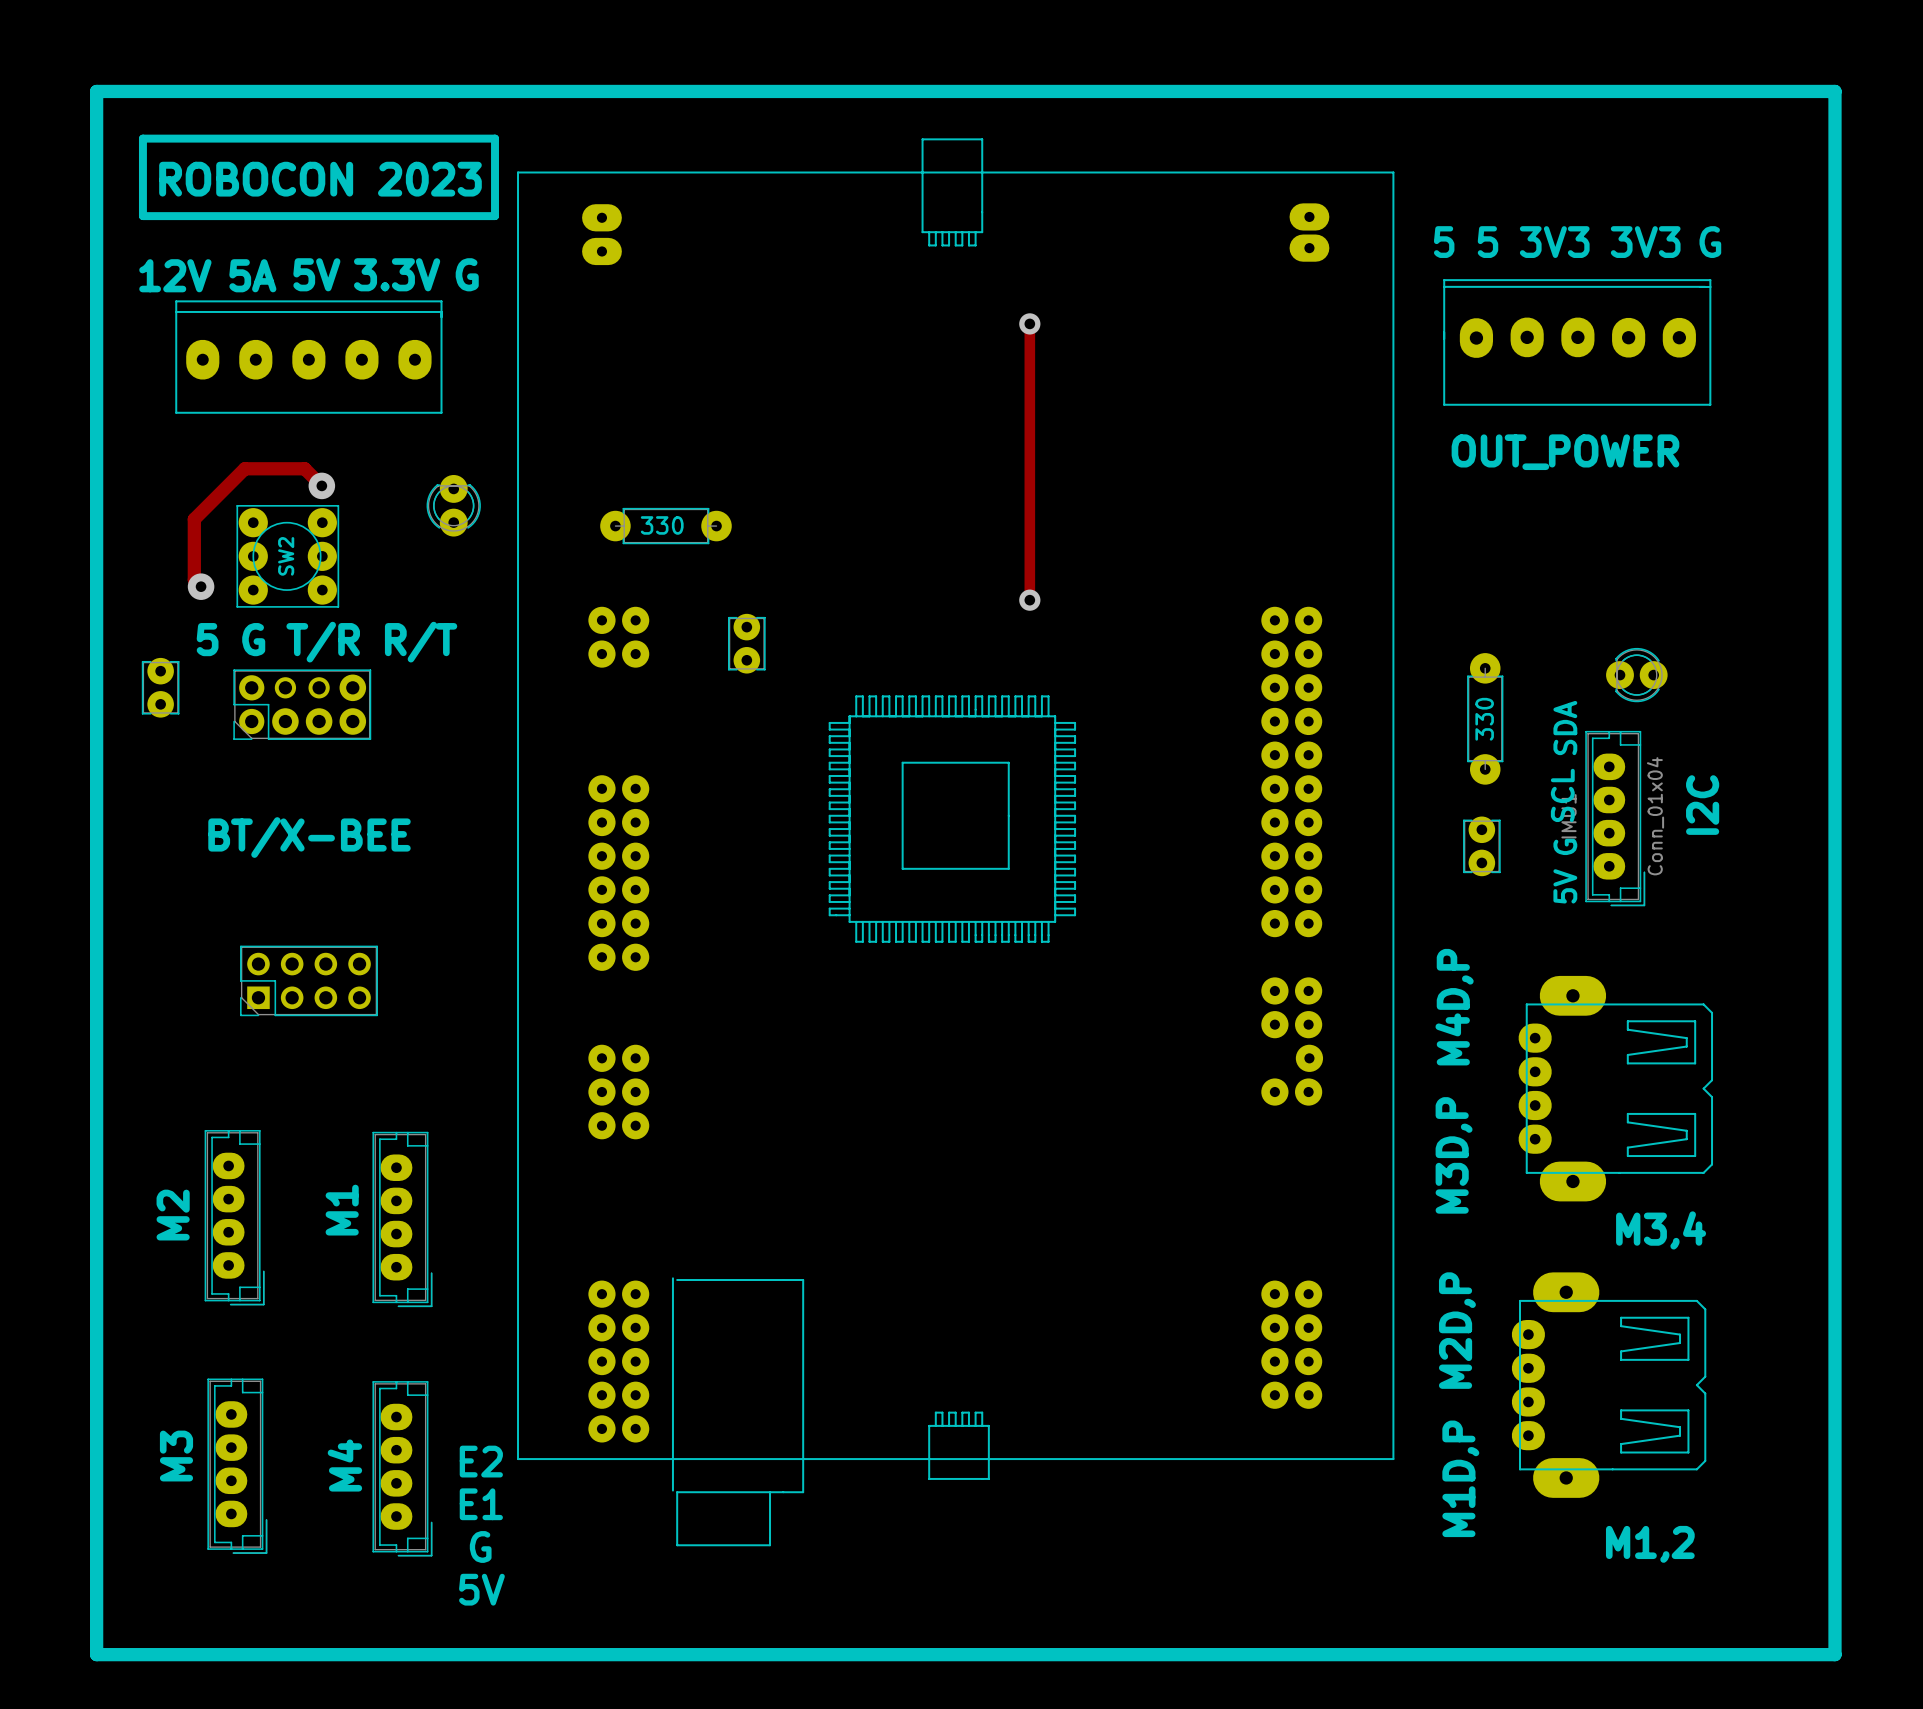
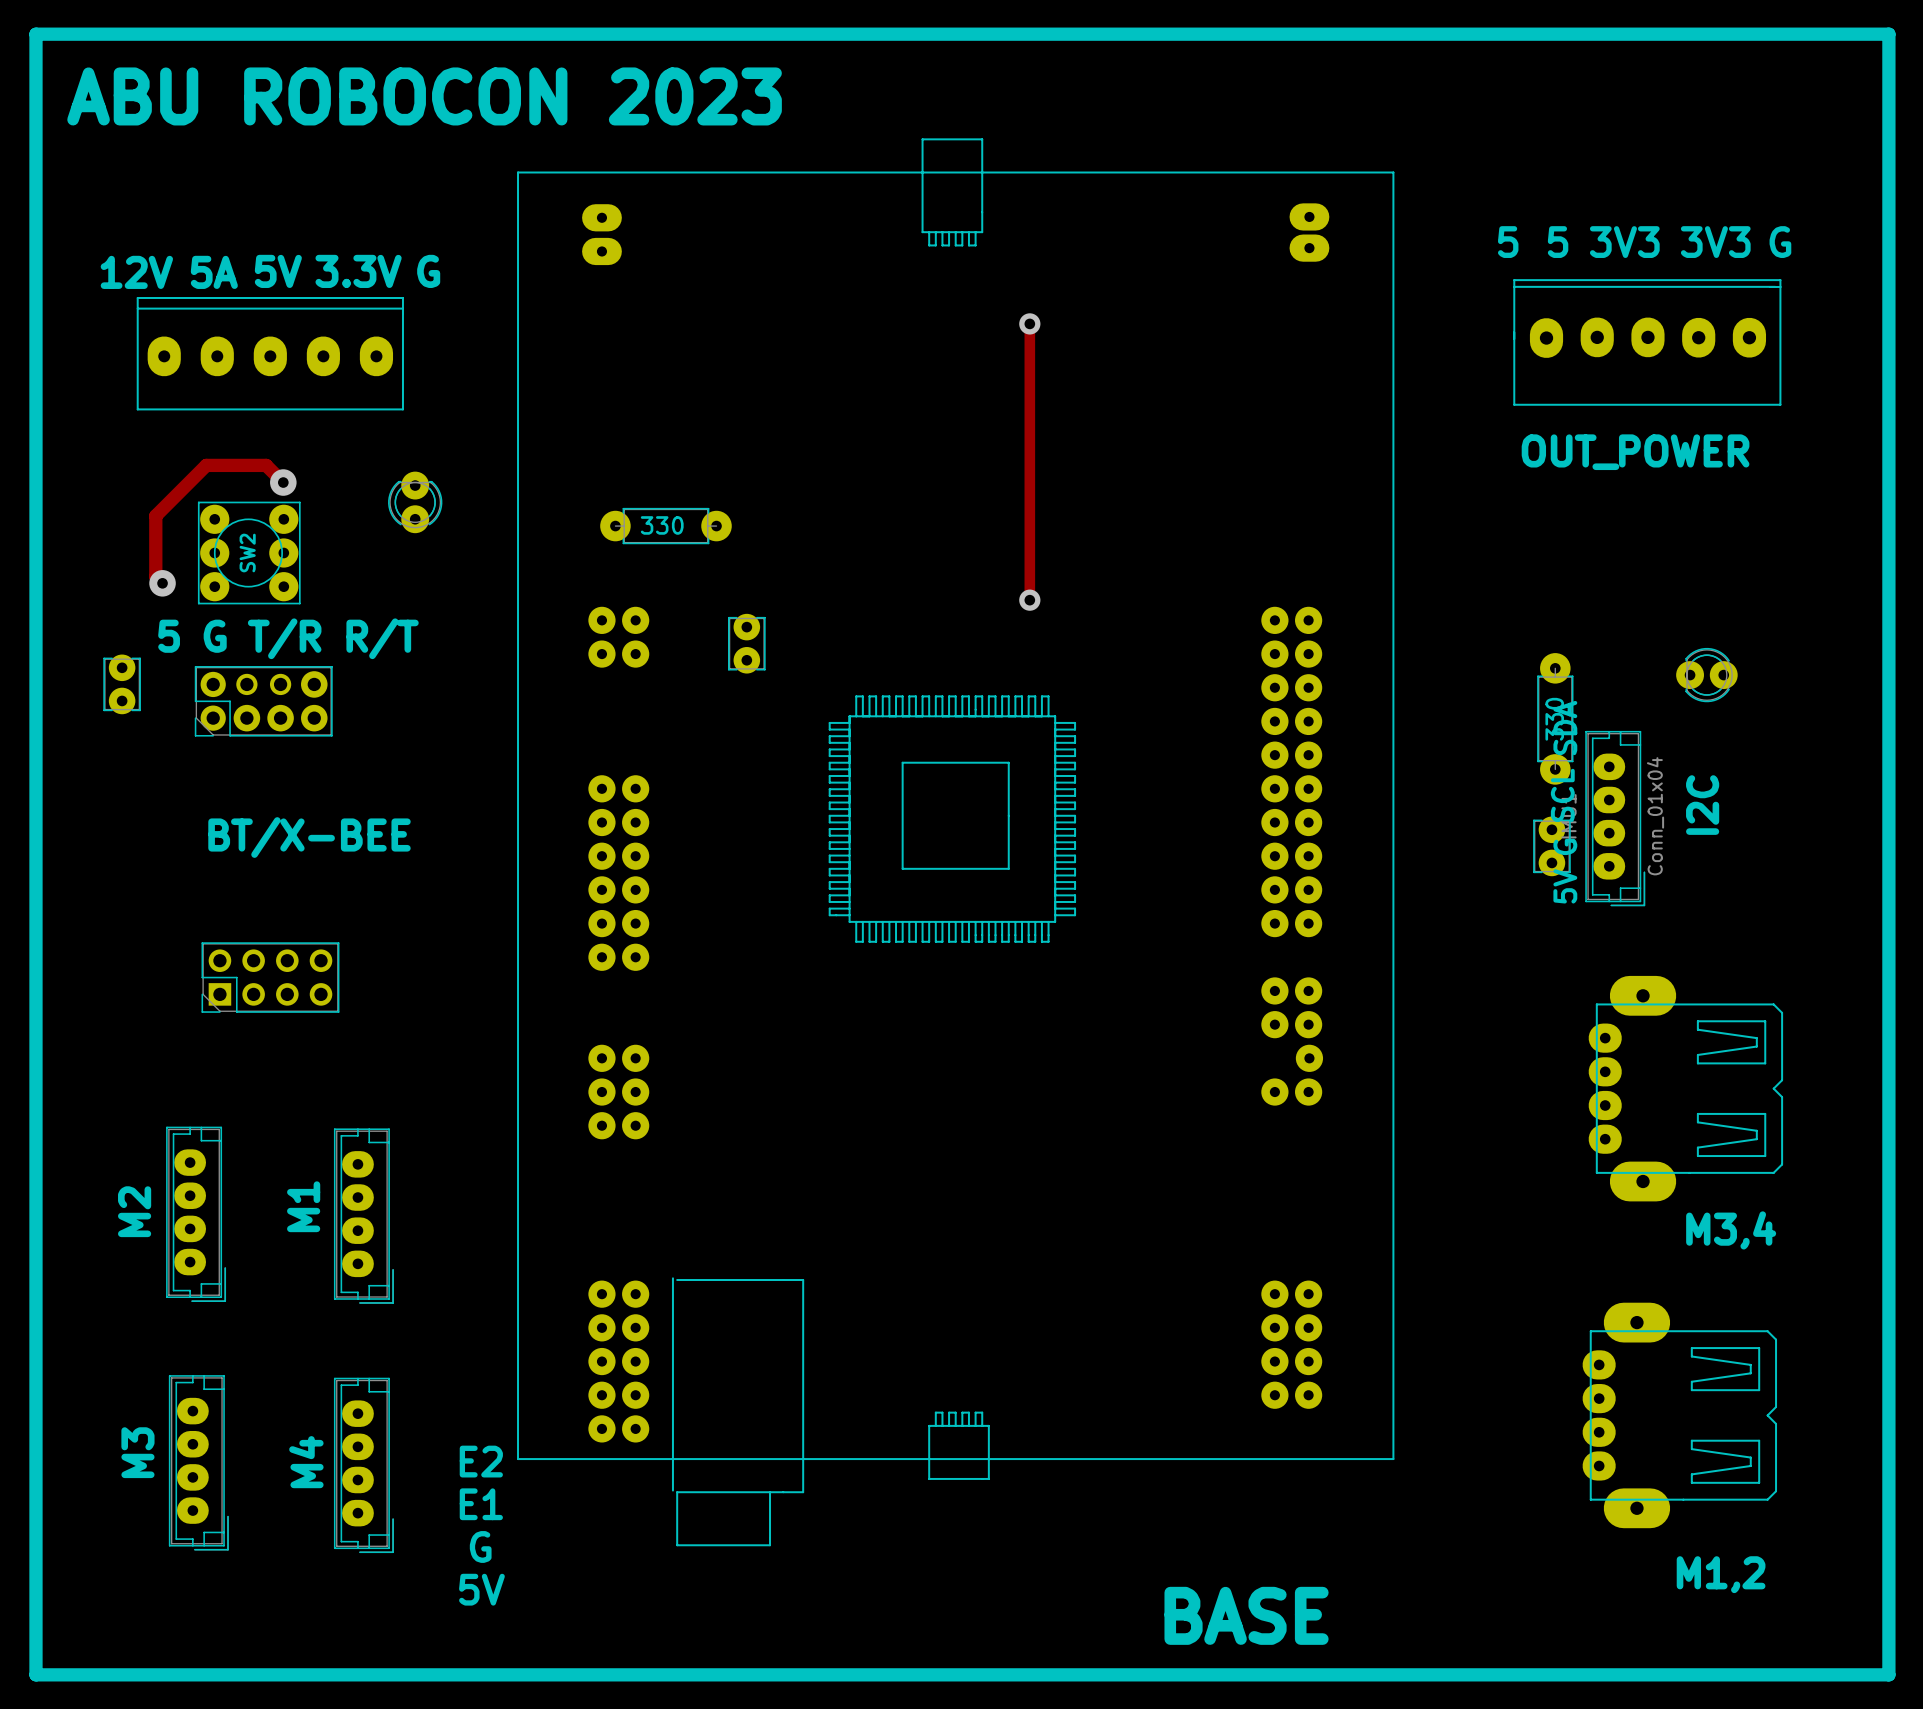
line: (96, 91) (1834, 91) (1834, 1654) (96, 1654) (96, 91) -> (35, 34) (35, 1674) (1888, 1674) (1888, 34) (35, 34)
text: none -> ABU ROBOCON 2023 (424, 96)
line: (142, 138) (495, 138) (495, 216) (142, 216) (142, 138) -> none
text: ROBOCON 2023 (320, 179) -> none
text: 5 (1444, 242) -> none
text position: 5 (1487, 242) -> 5 (1508, 242)
text: 3V3 (1554, 242) -> 5 (1558, 242)
text position: 3V3 (1645, 242) -> 3V3 (1624, 242)
text position: G (1710, 242) -> G (1780, 242)
text: none -> 3V3 (1715, 242)
text position: 5V (316, 274) -> 5V (278, 271)
text position: 3.3V (397, 274) -> 3.3V (358, 271)
text position: G (467, 274) -> G (428, 271)
text position: 12V (175, 275) -> 12V (136, 272)
text position: 5A (252, 275) -> 5A (214, 272)
part position: (1577, 342) -> (1647, 342)
part position: (308, 357) -> (270, 353)
text position: OUT_POWER (1565, 452) -> OUT_POWER (1635, 452)
track: (321, 485) (304, 468) (244, 468) (194, 519) (194, 579) (201, 586) -> (283, 482) (266, 465) (206, 465) (155, 515) (155, 576) (162, 583)
via position: (321, 485) -> (283, 482)
part position: (453, 505) -> (415, 502)
SW2 position: (287, 556) -> (249, 553)
via position: (201, 586) -> (162, 583)
text position: 5 G T/R R/T (326, 642) -> 5 G T/R R/T (288, 638)
part position: (1636, 675) -> (1706, 675)
part position: (160, 687) -> (122, 684)
part position: (302, 704) -> (263, 701)
part position: (1485, 718) -> (1555, 718)
part position: (1481, 846) -> (1551, 846)
part position: (309, 980) -> (270, 977)
text: M4D,P (1454, 1007) -> none
part position: (1615, 1088) -> (1685, 1088)
text: M3D,P (1454, 1155) -> none
M2 position: (234, 1217) -> (196, 1214)
M1 position: (402, 1219) -> (363, 1216)
text: M2D,P (1457, 1330) -> none
part position: (1609, 1385) -> (1679, 1415)
M3 position: (237, 1466) -> (198, 1462)
M4 position: (402, 1468) -> (363, 1465)
text: M1D,P (1460, 1478) -> none
text: none -> BASE (1246, 1615)

